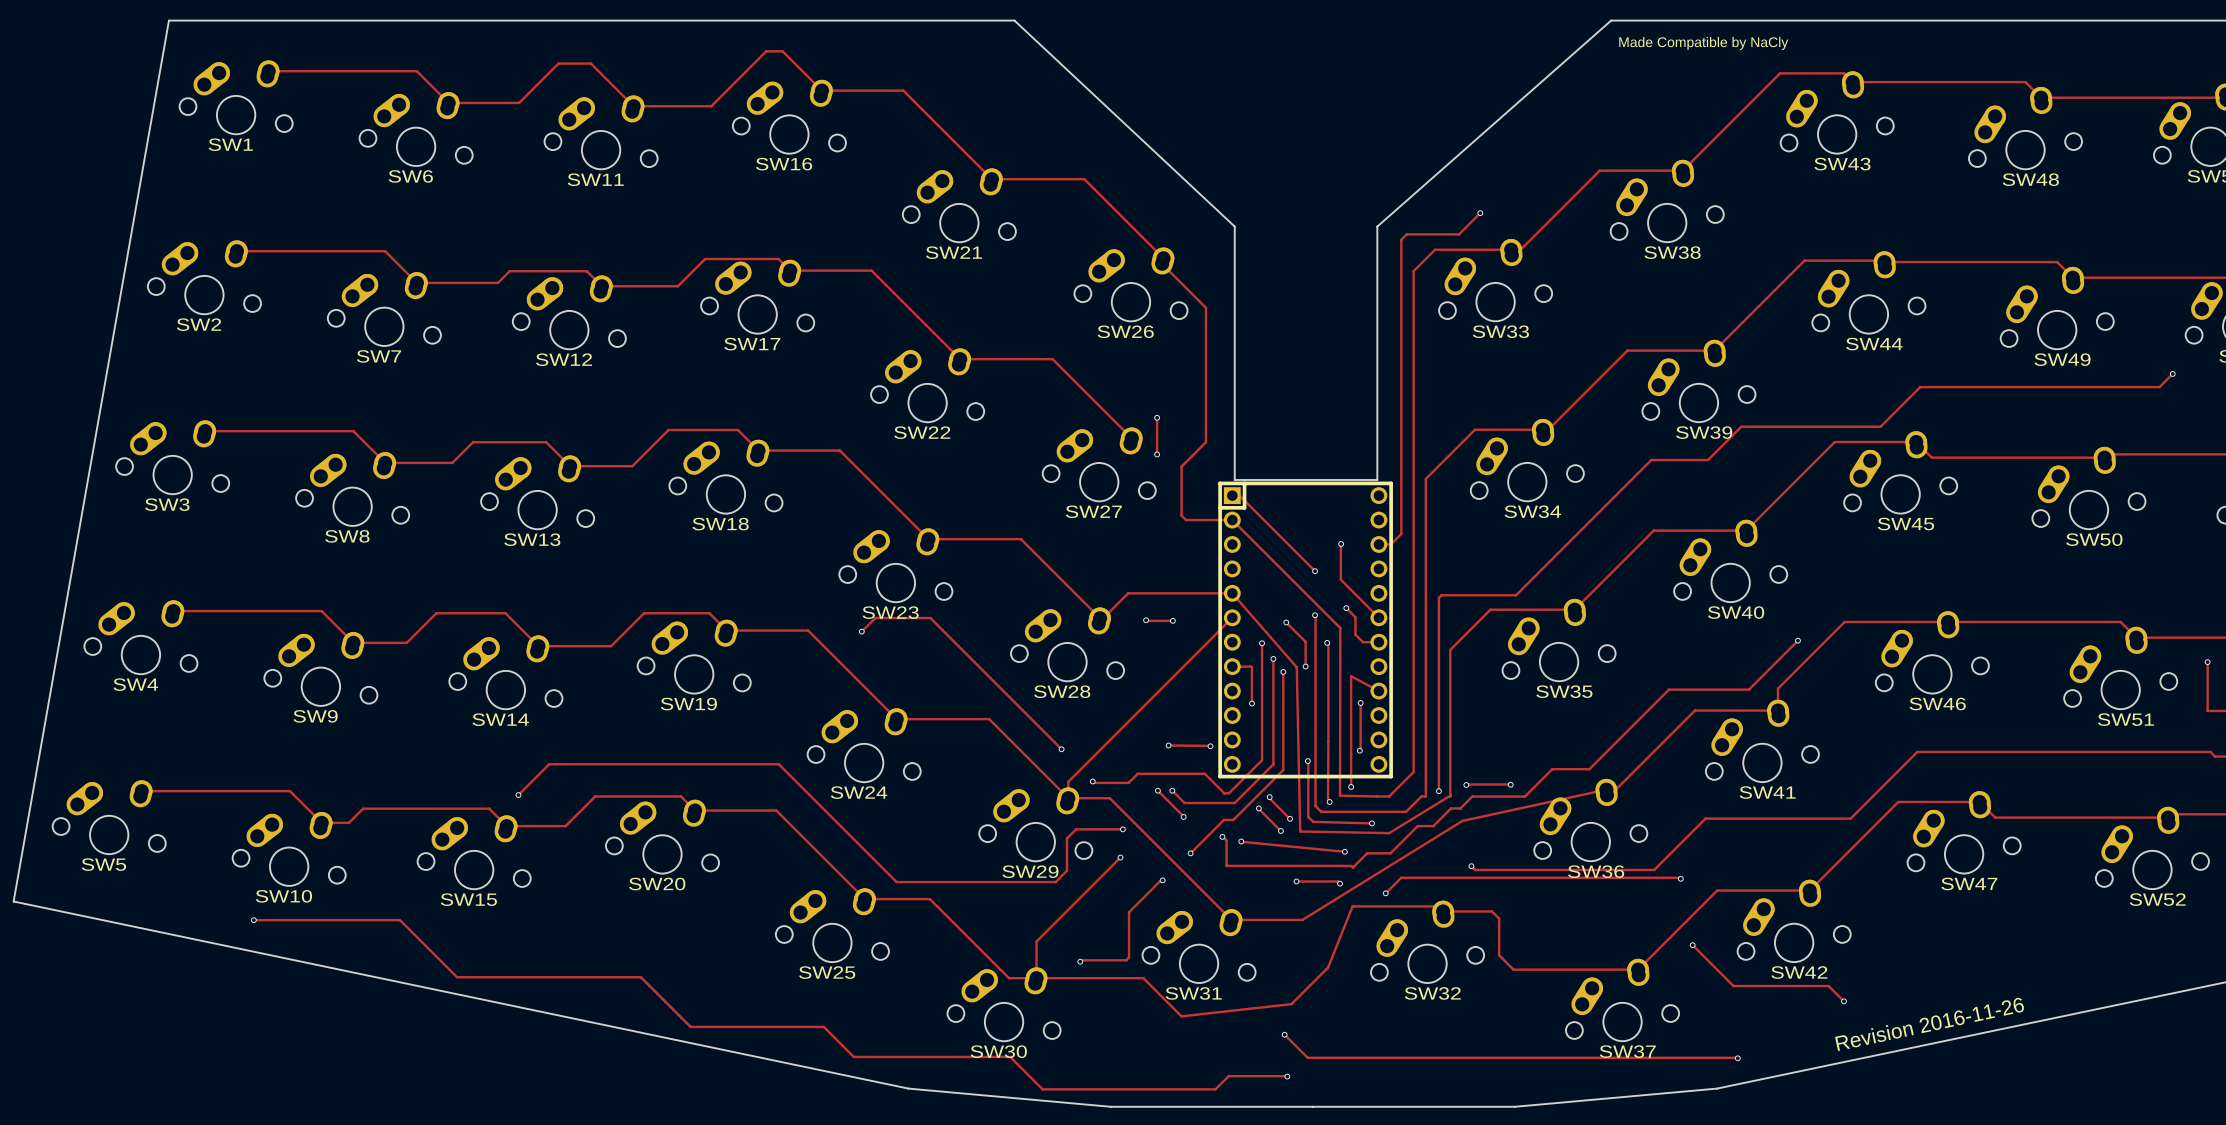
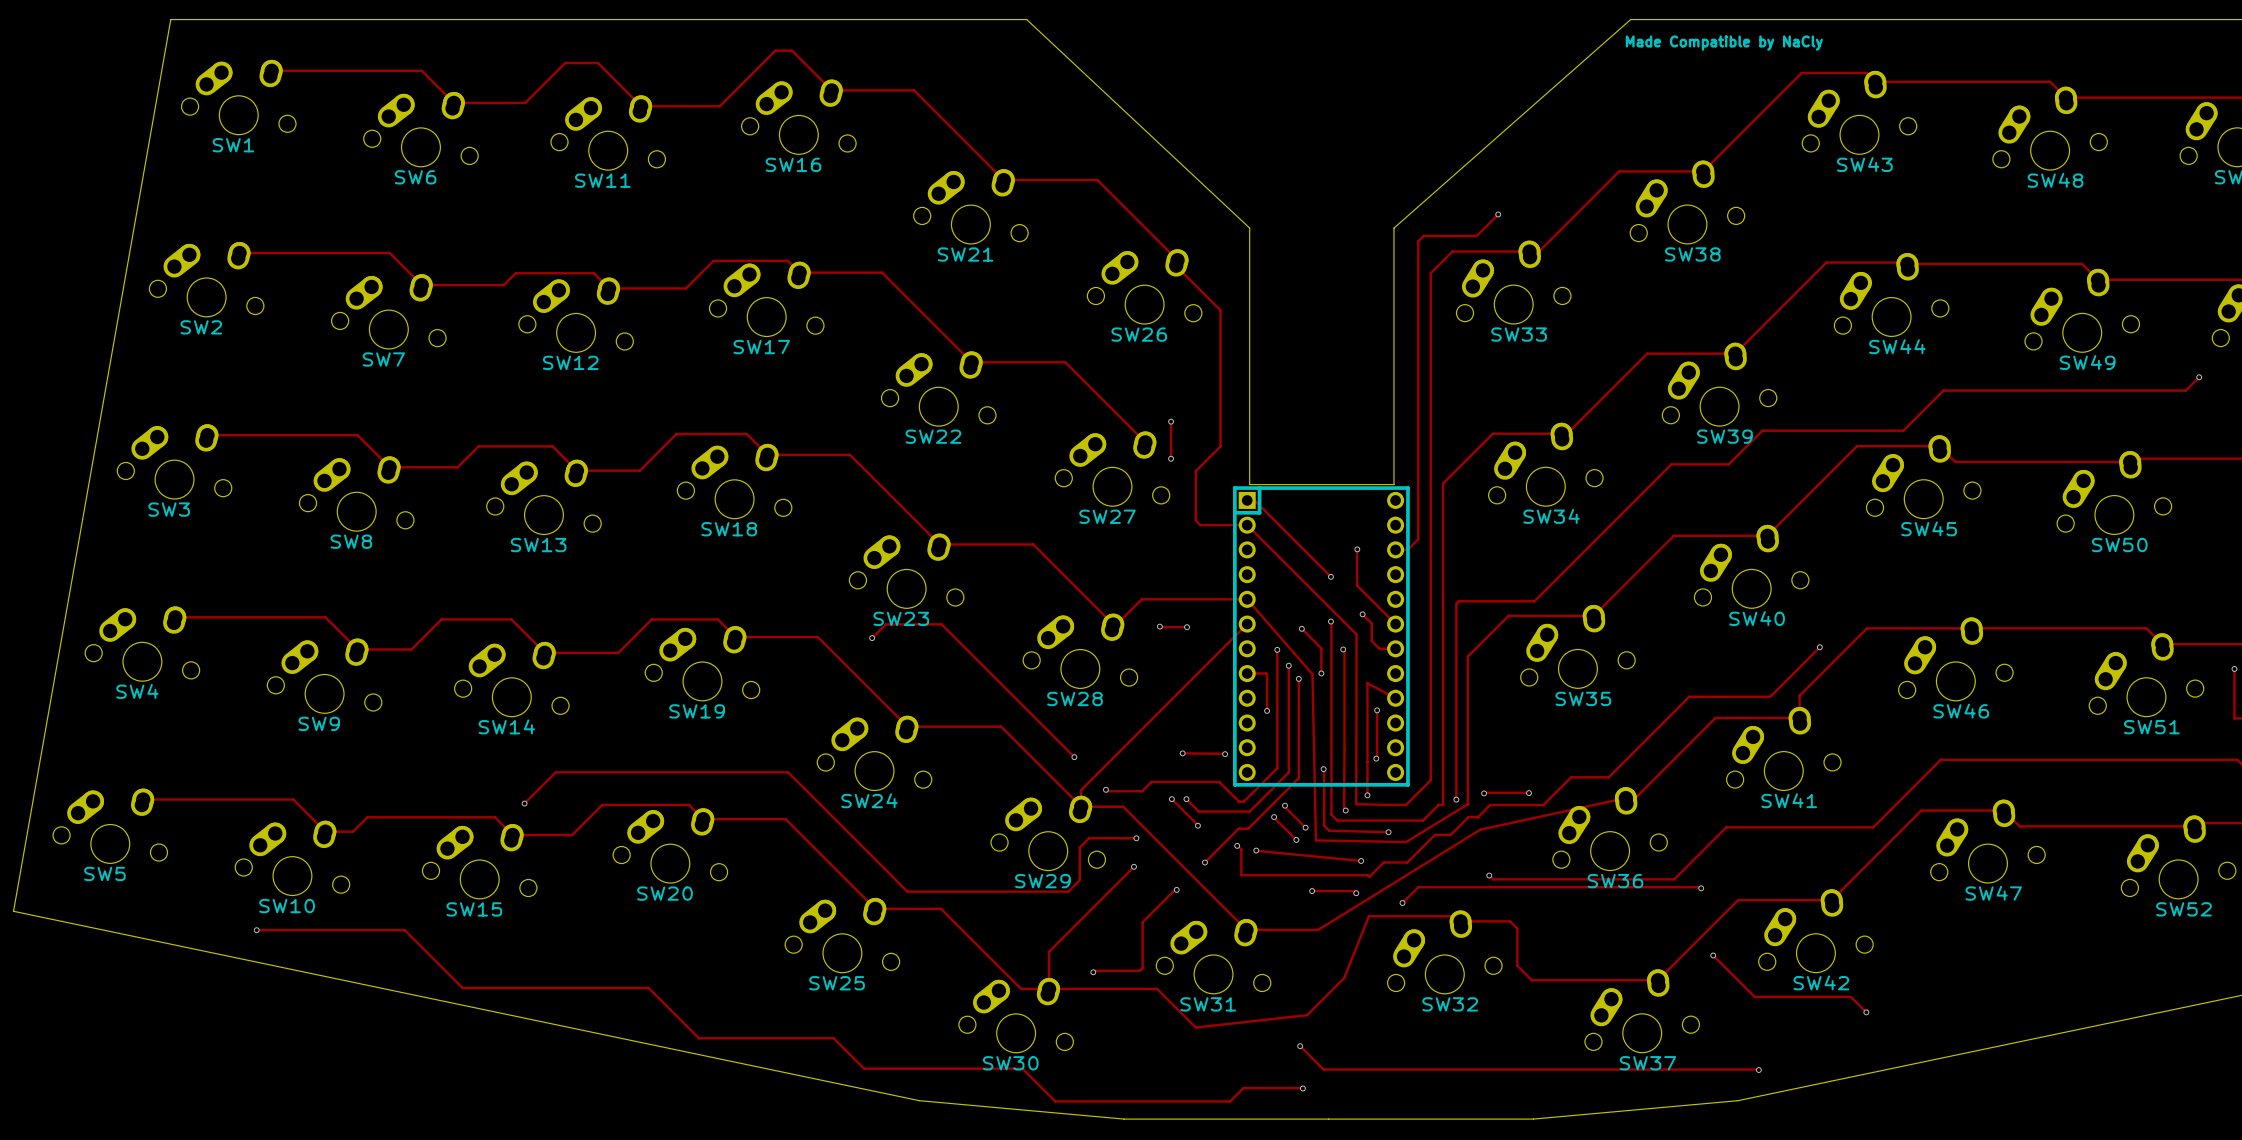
text: Revision 2016-11-26 (1929, 1024) -> none

